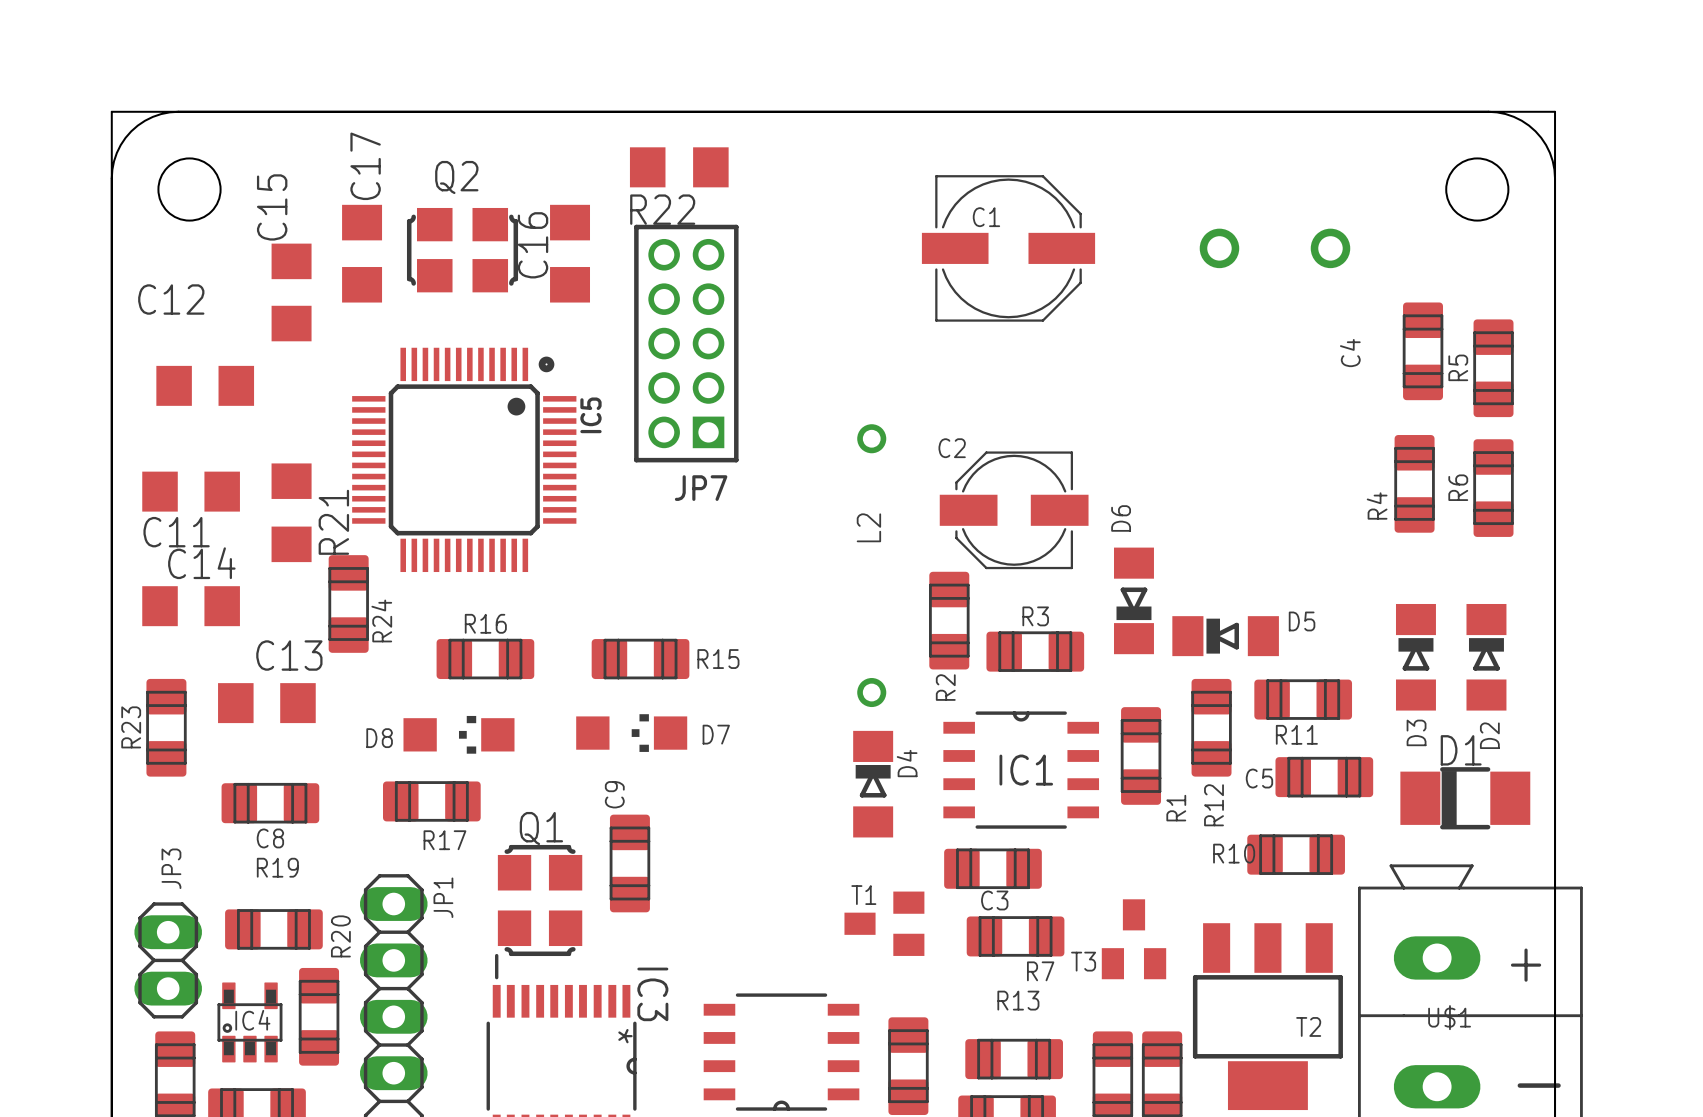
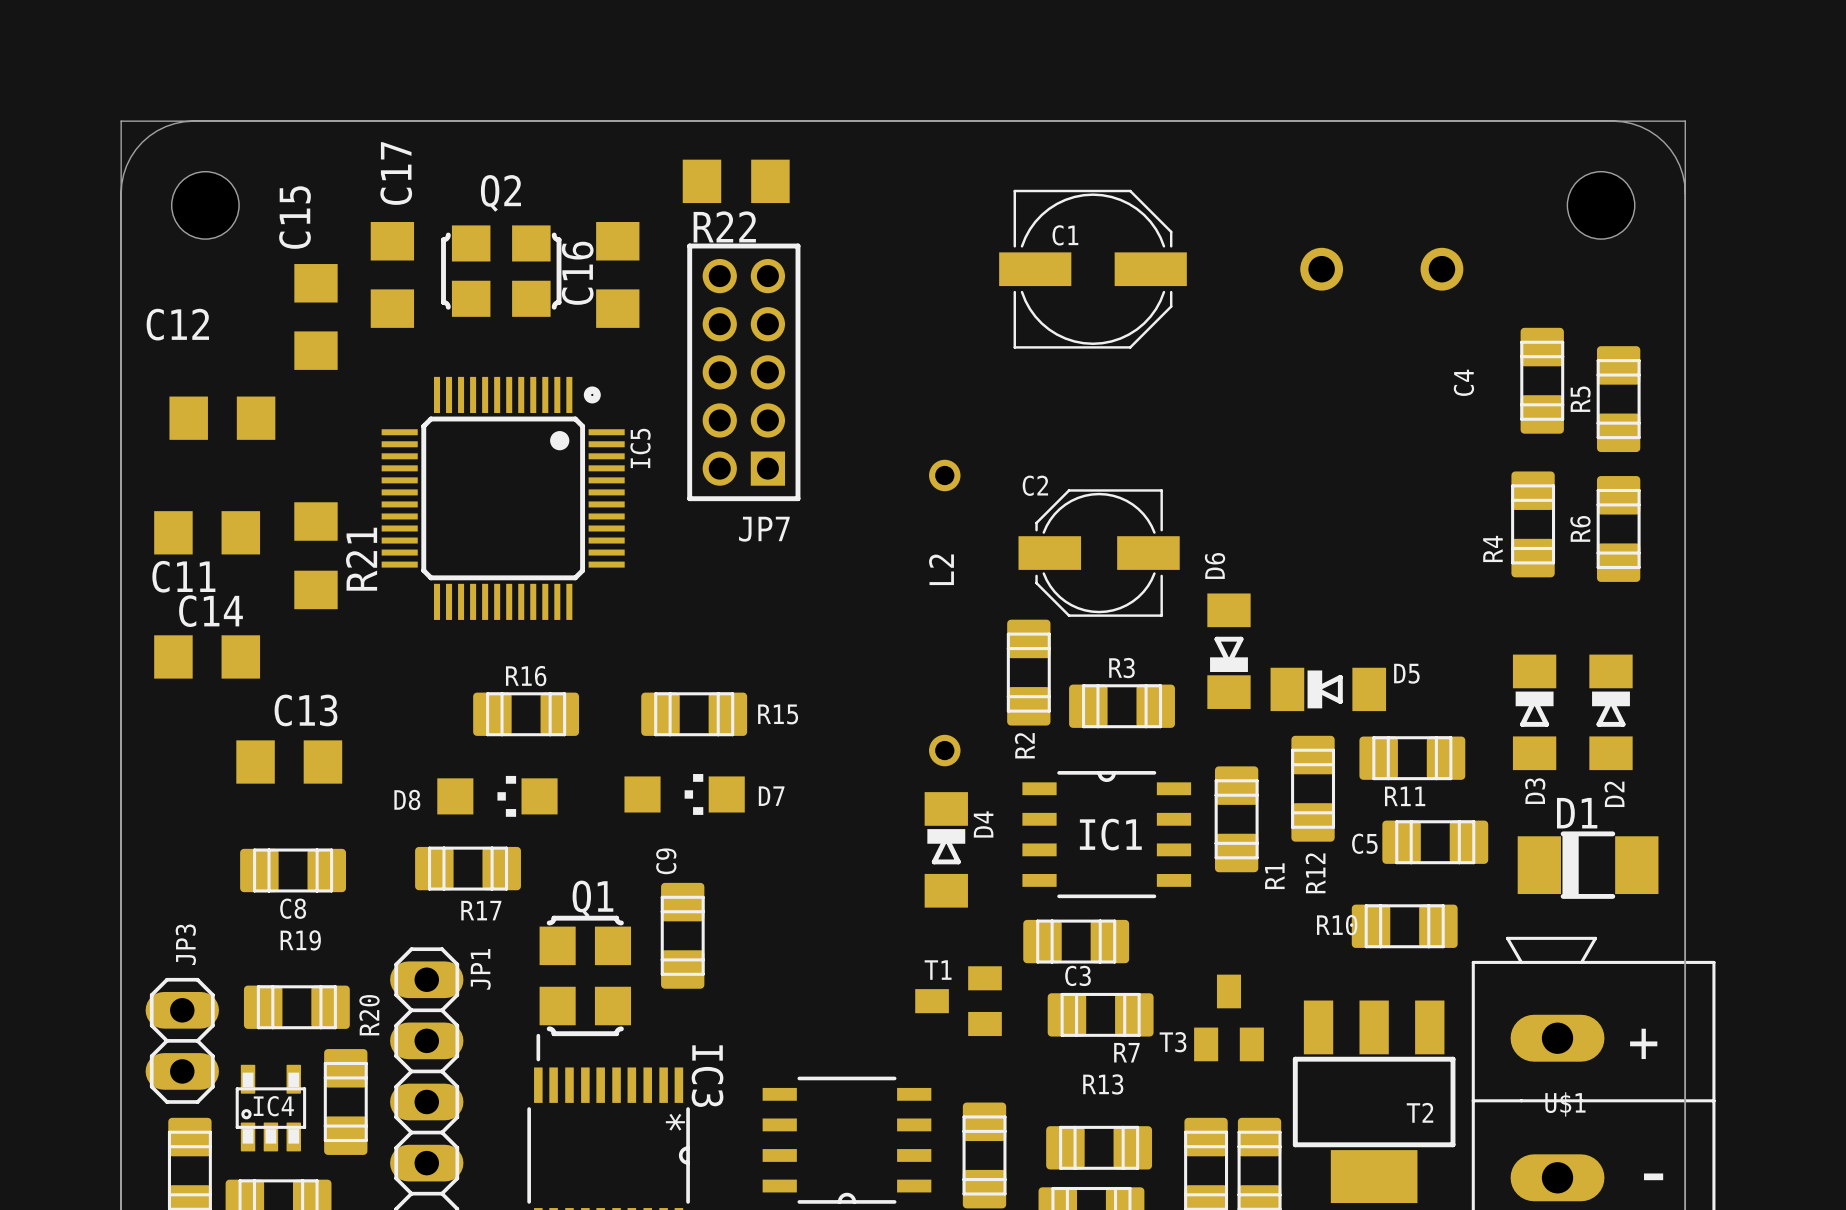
R24: (348, 603) -> none
R23: (166, 727) -> none

